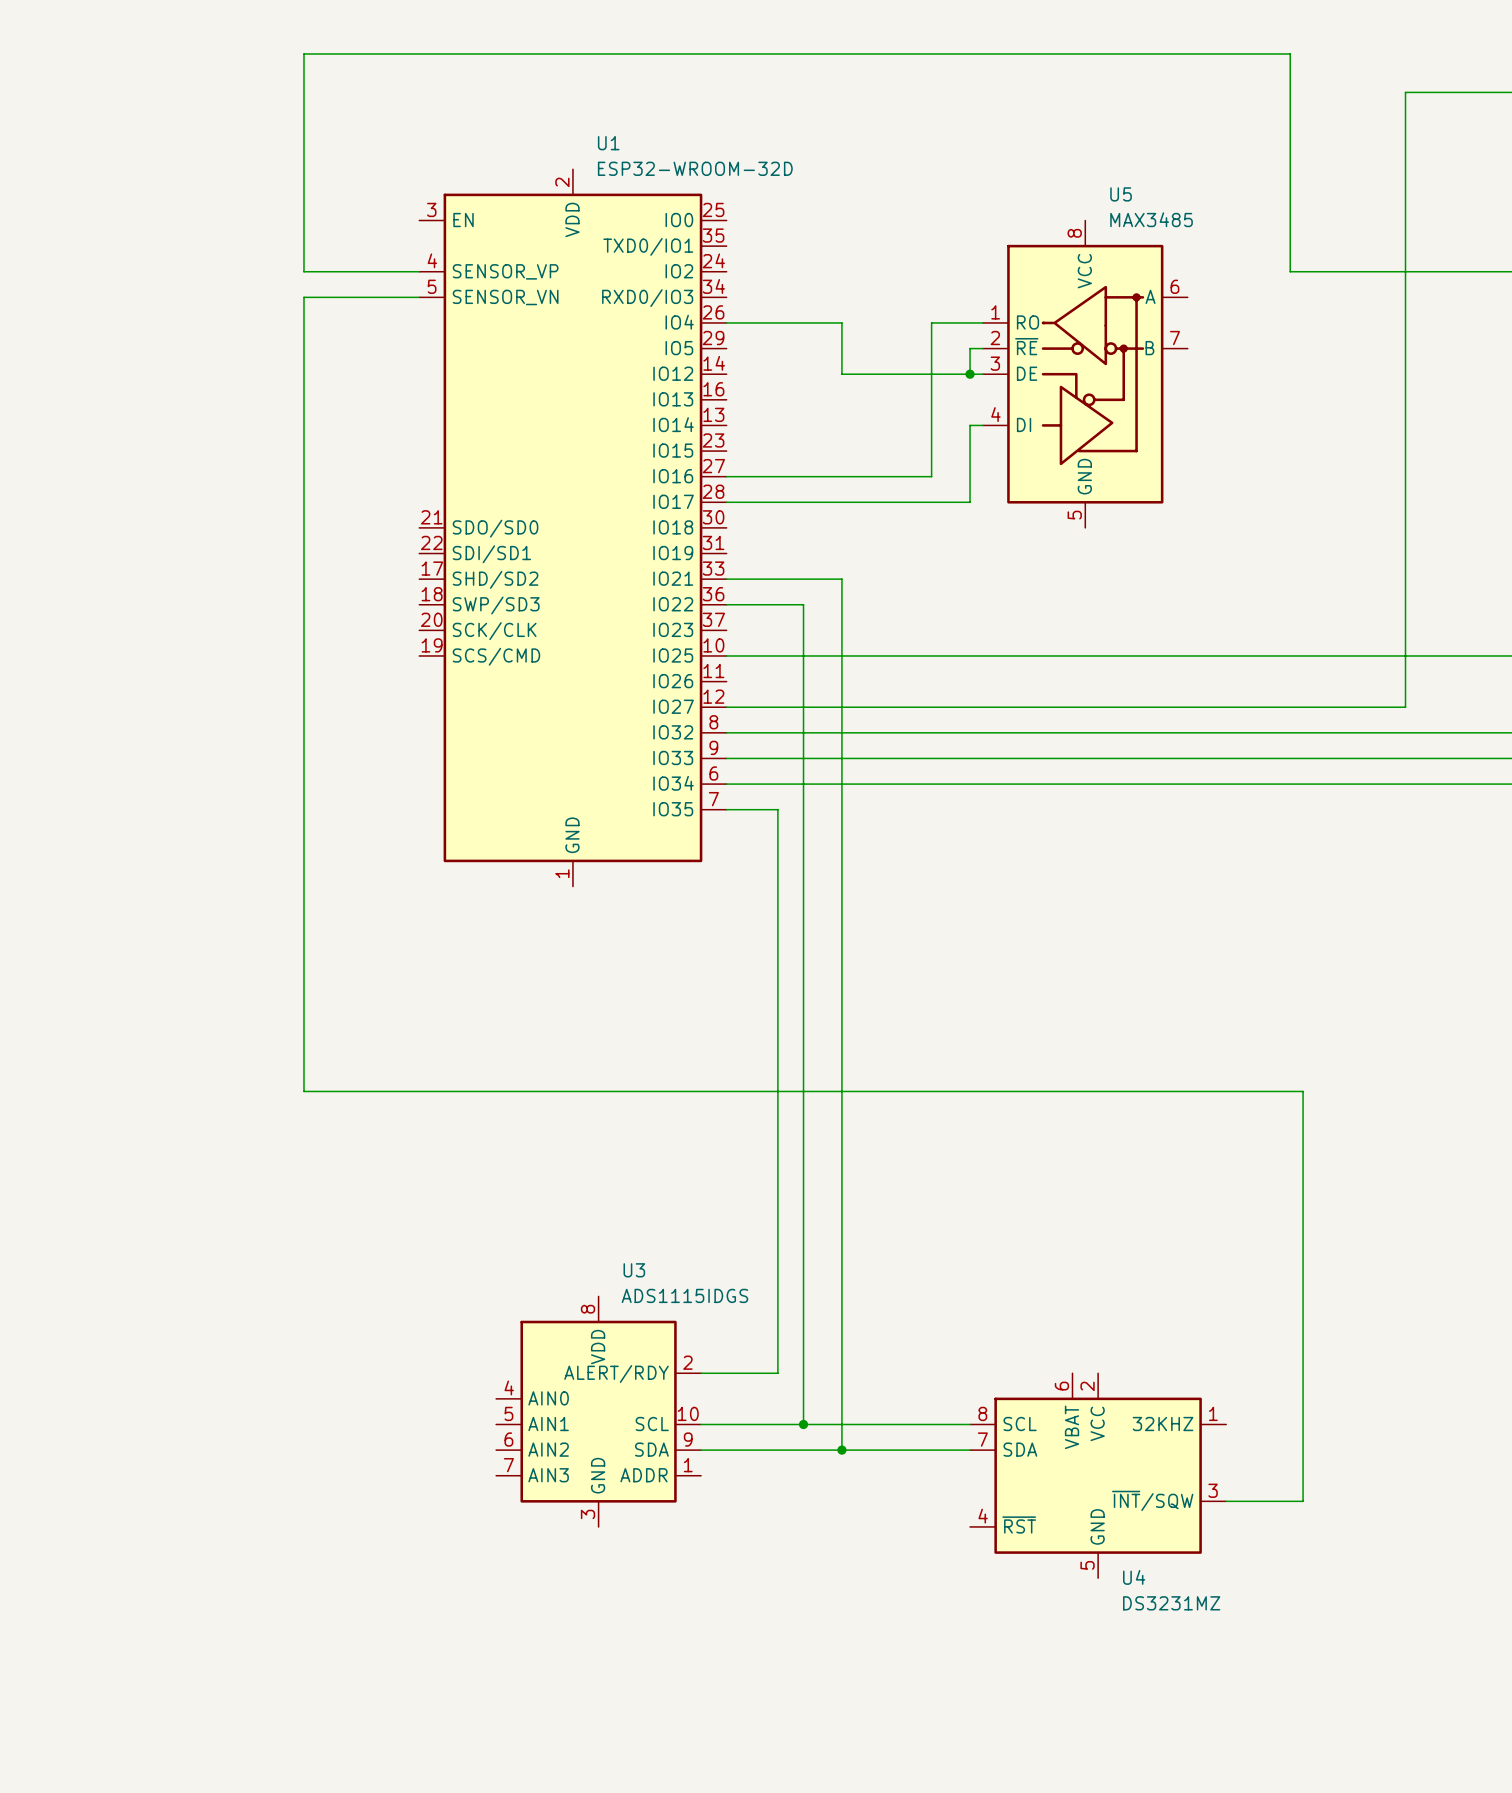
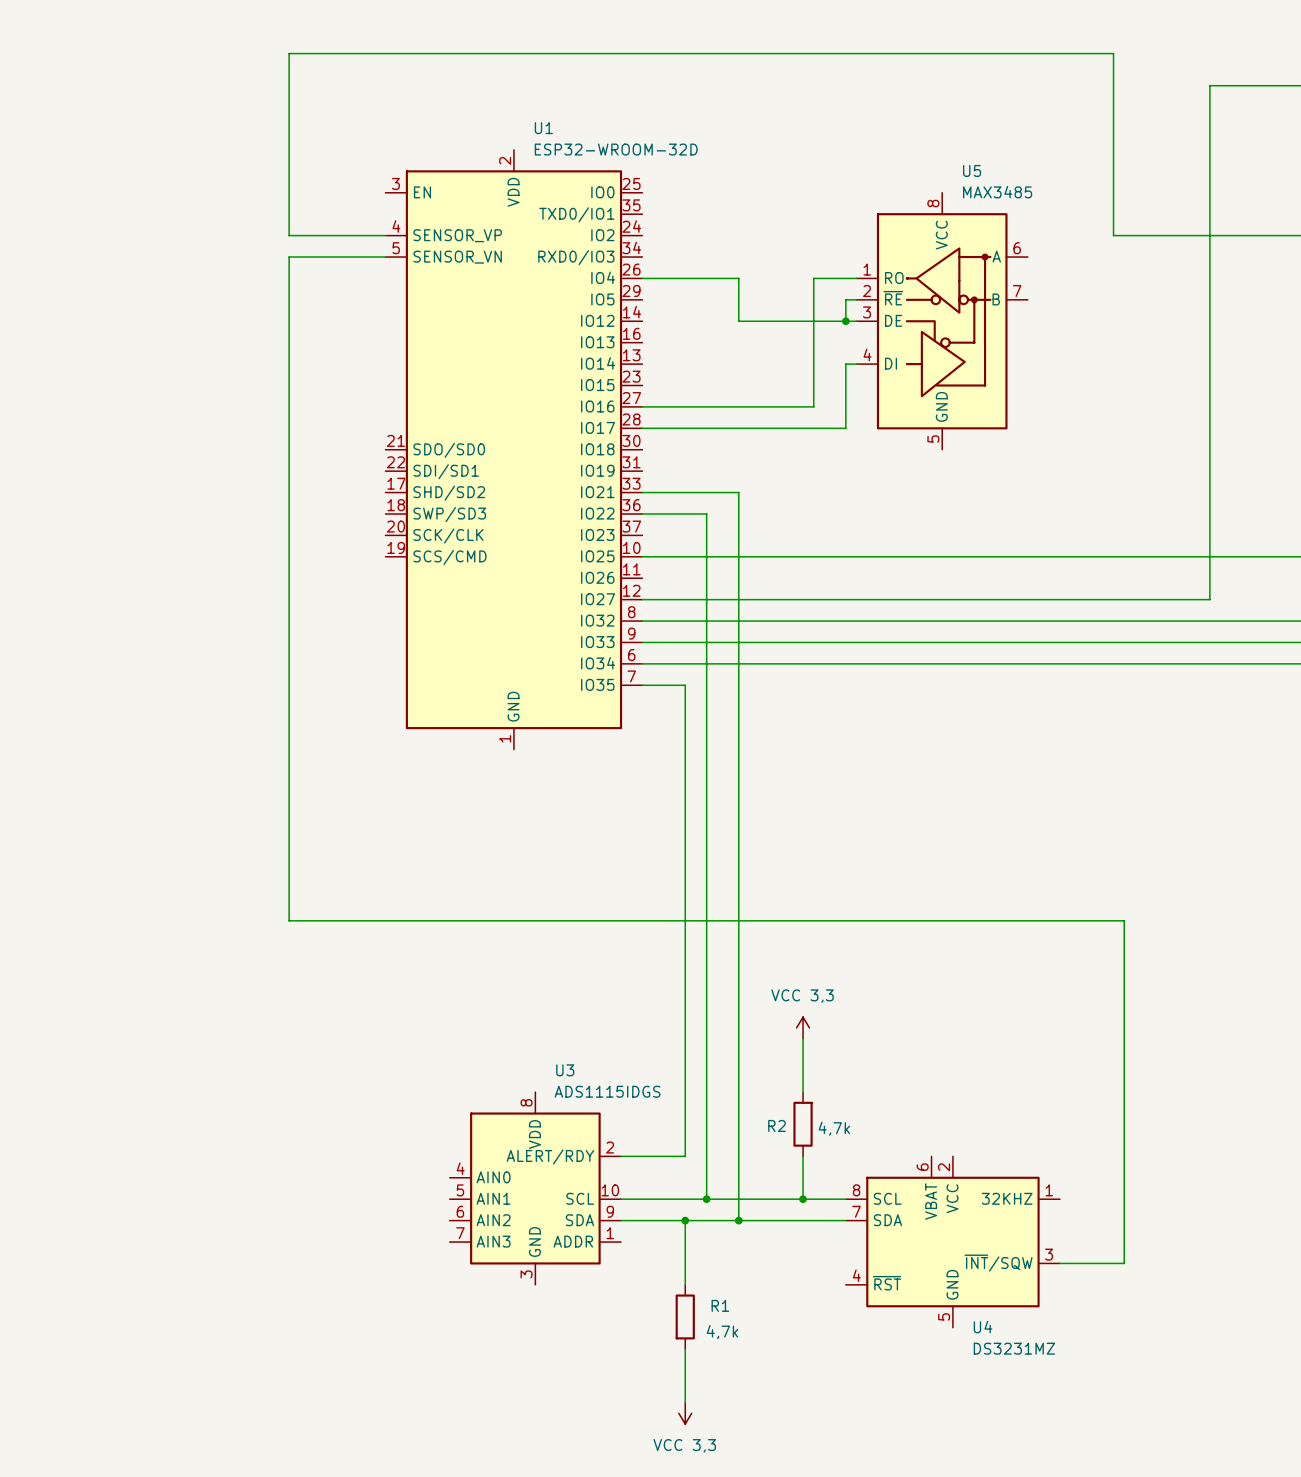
power symbol: none -> VCC 3,3 (803, 1027)
wire: none -> (803, 1038) (803, 1092)
R2: none -> 4,7k (803, 1124)
wire: none -> (803, 1156) (803, 1199)
junction: none -> (803, 1199)
wire: none -> (685, 1220) (685, 1284)
junction: none -> (685, 1220)
R1: none -> 4,7k (685, 1316)
wire: none -> (685, 1349) (685, 1402)
power symbol: none -> VCC 3,3 (685, 1413)

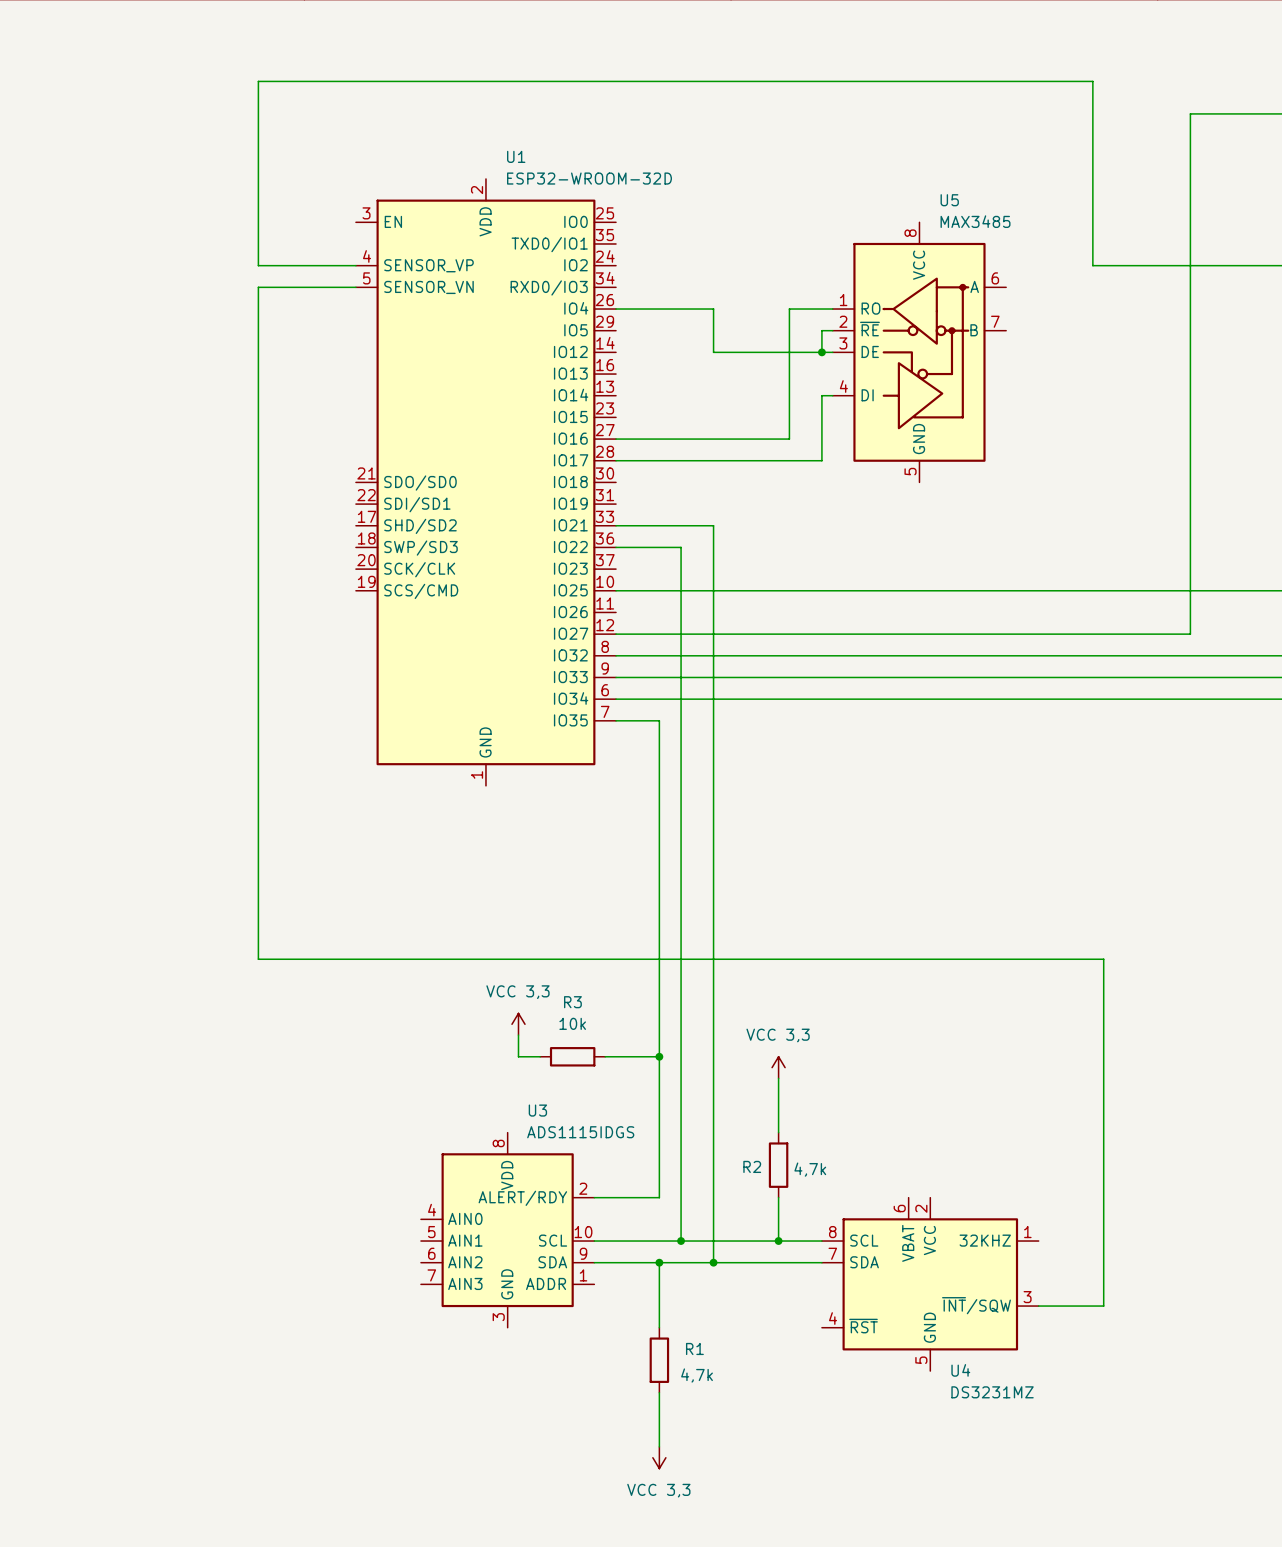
power symbol: none -> VCC 3,3 (518, 1024)
wire: none -> (518, 1035) (518, 1056) (540, 1056)
R3: none -> 10k (572, 1056)
wire: none -> (605, 1056) (659, 1056)
junction: none -> (659, 1056)

